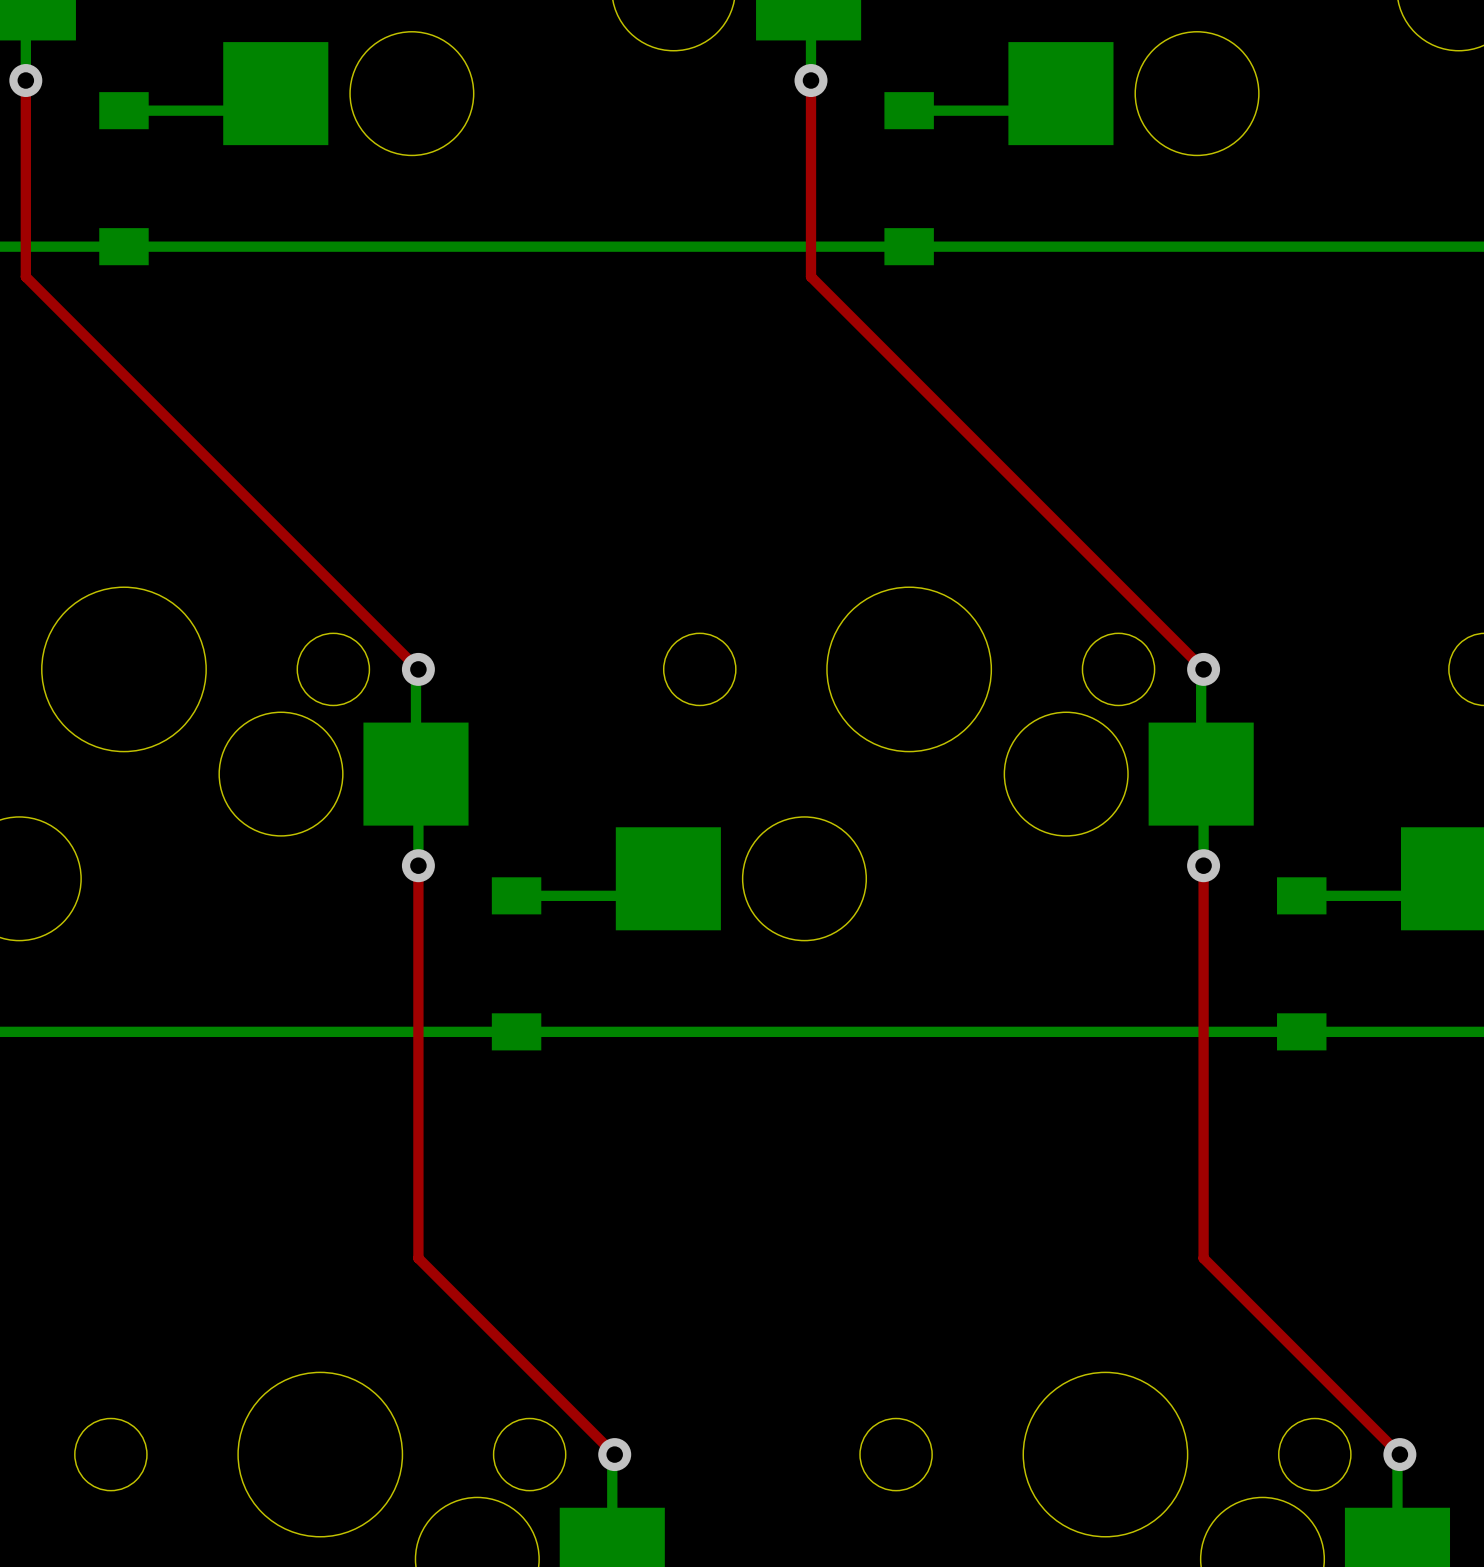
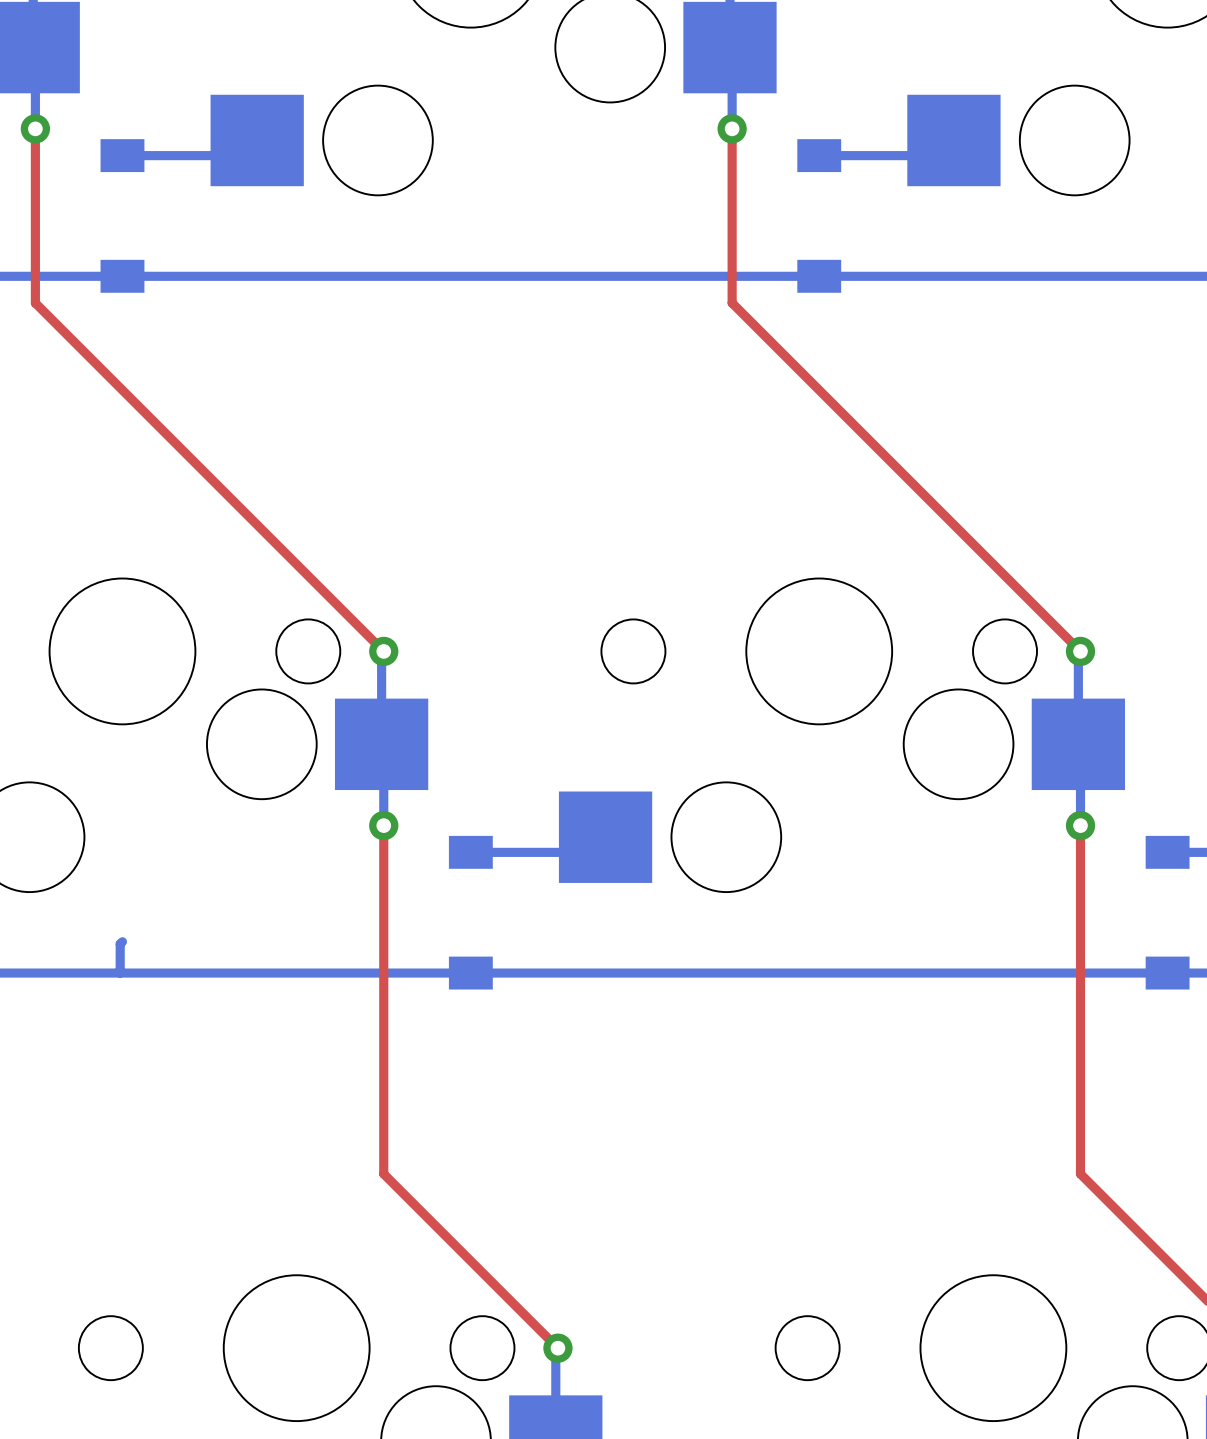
bottom track: none -> (122, 941) (120, 944) (120, 973)

